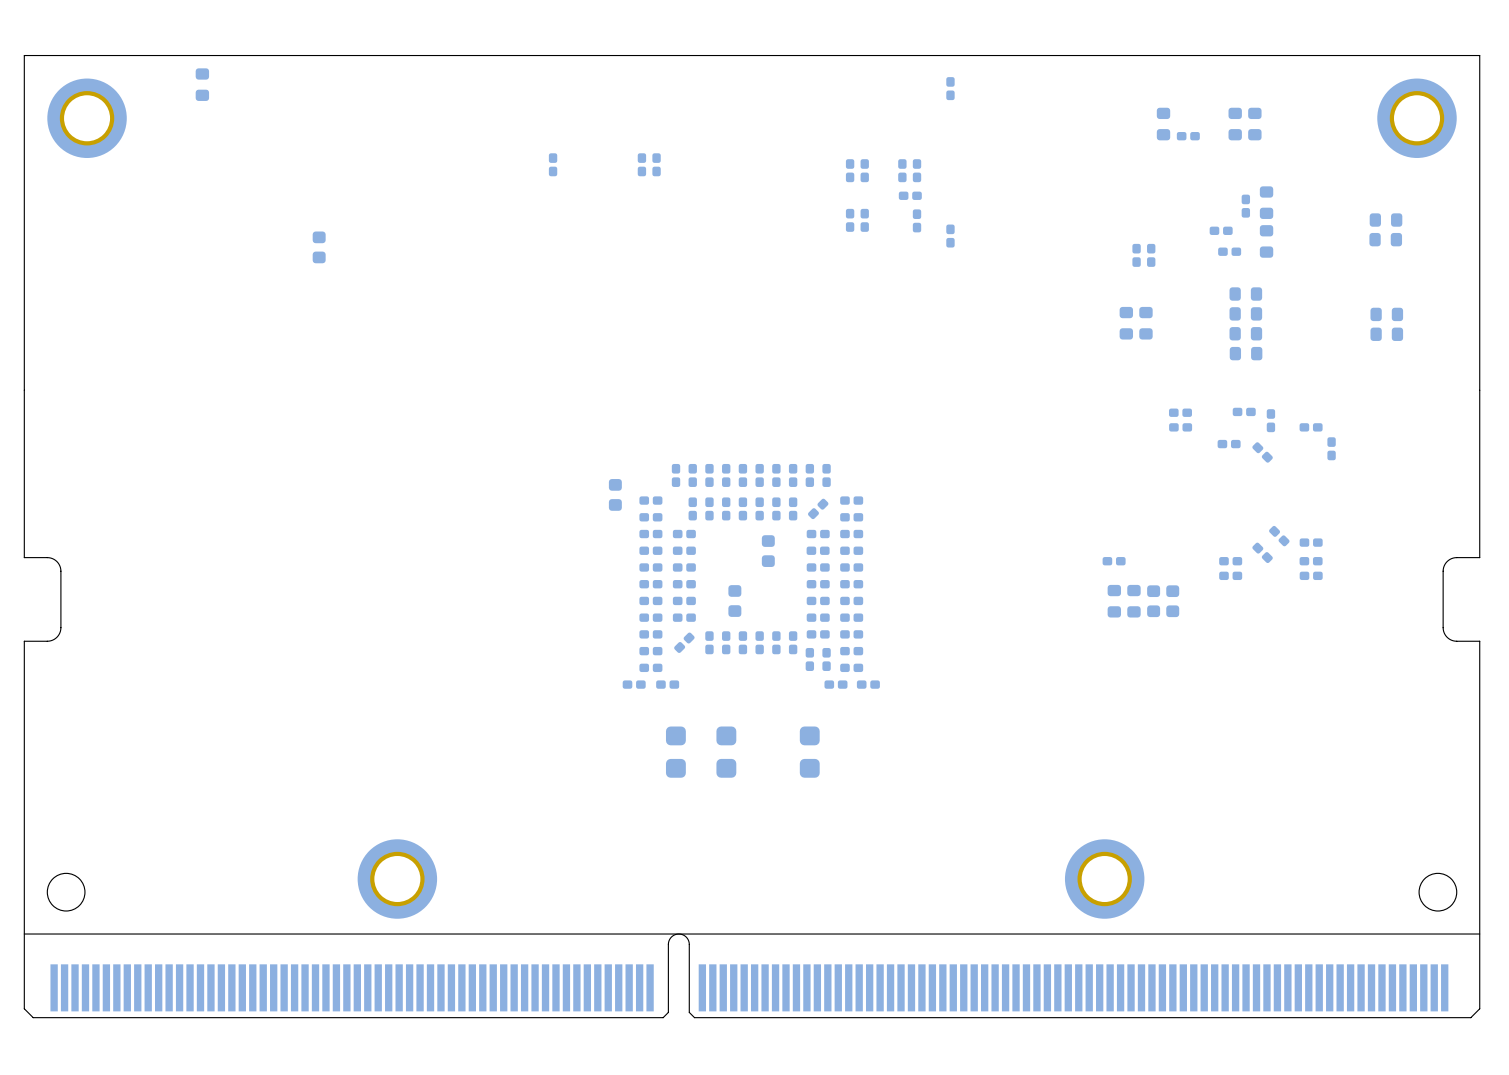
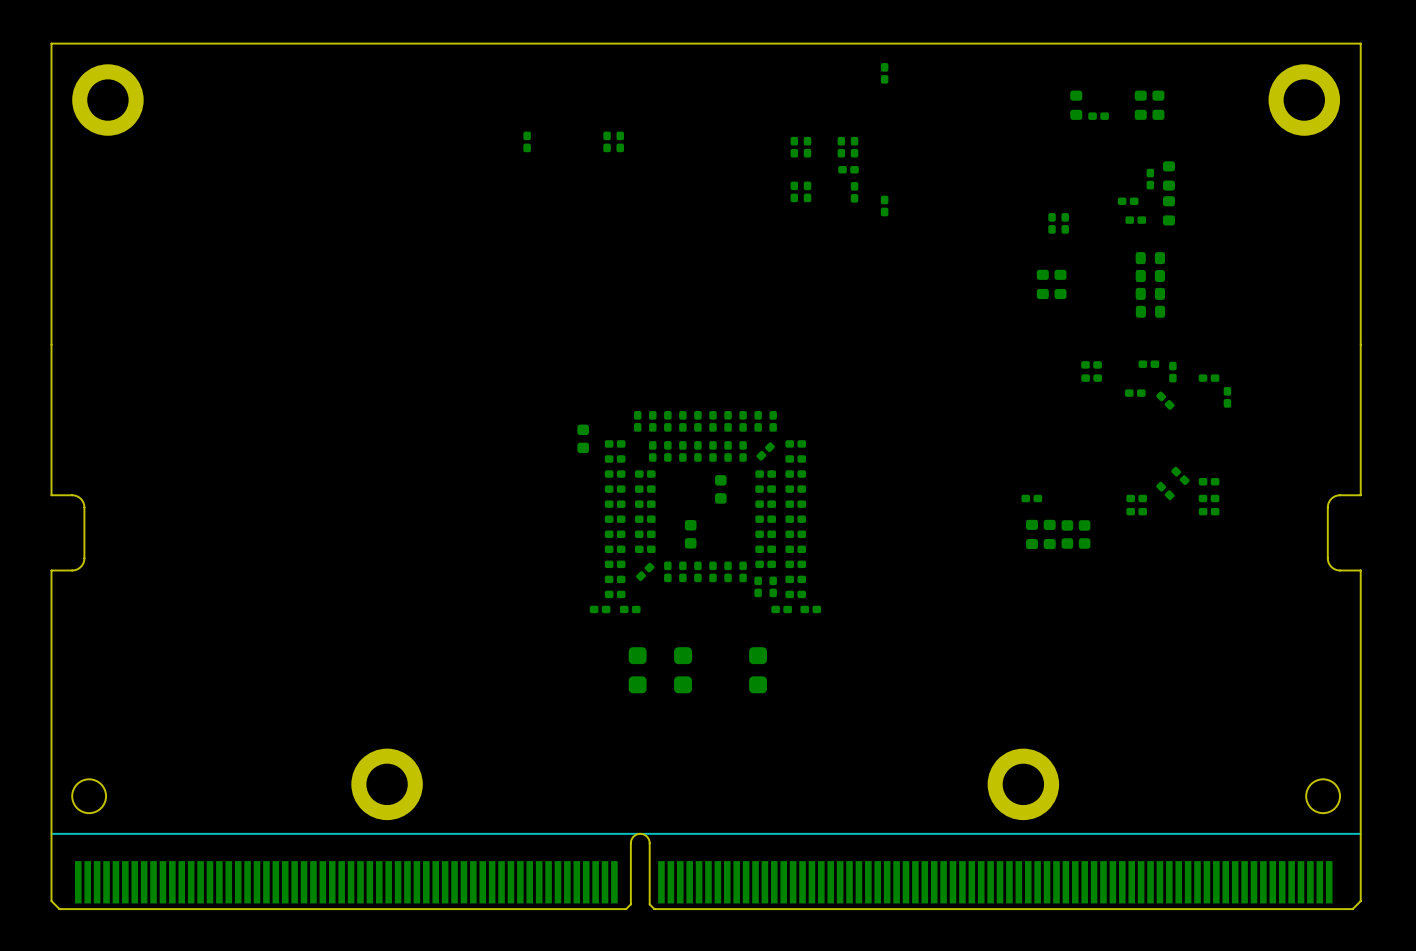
part footprint: [47, 78, 127, 158] -> [72, 64, 144, 136]
part footprint: [1377, 78, 1457, 158] -> [1268, 64, 1341, 136]
part: (202, 84) -> none
part: (1386, 220) -> none
part: (1385, 239) -> none
part: (319, 247) -> none
part: (1386, 314) -> none
part: (1386, 334) -> none
part footprint: [357, 839, 438, 919] -> [351, 748, 423, 821]
part footprint: [1064, 839, 1145, 919] -> [987, 748, 1060, 821]

